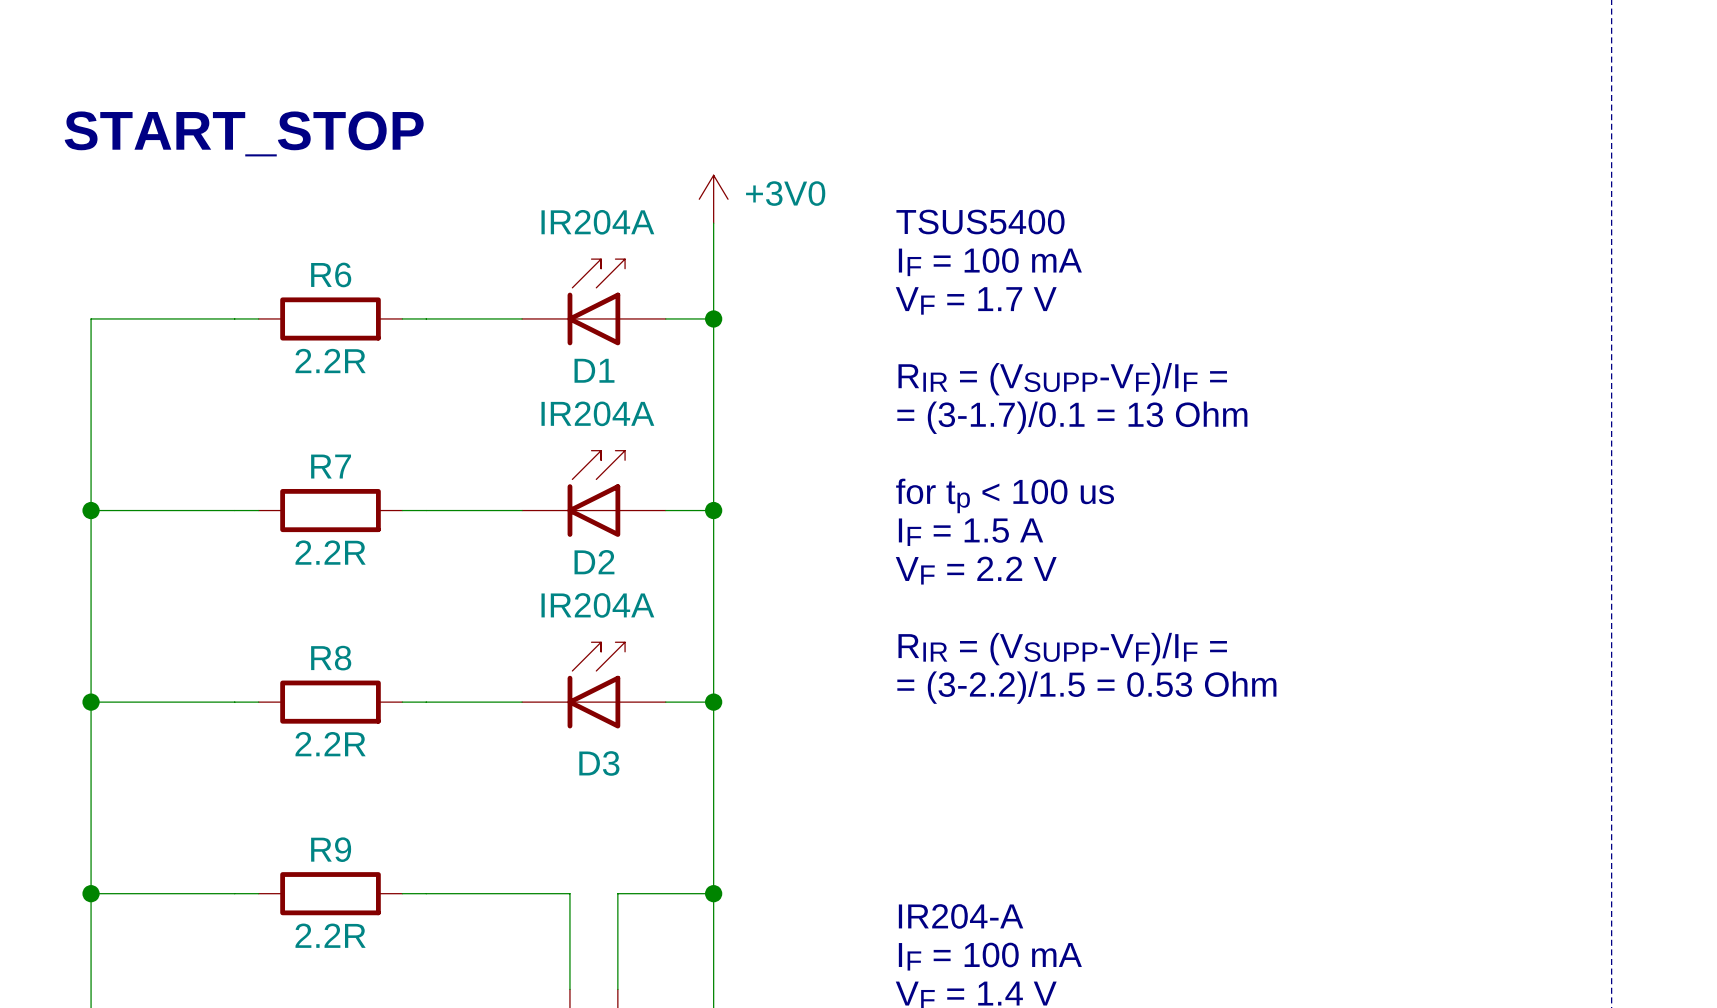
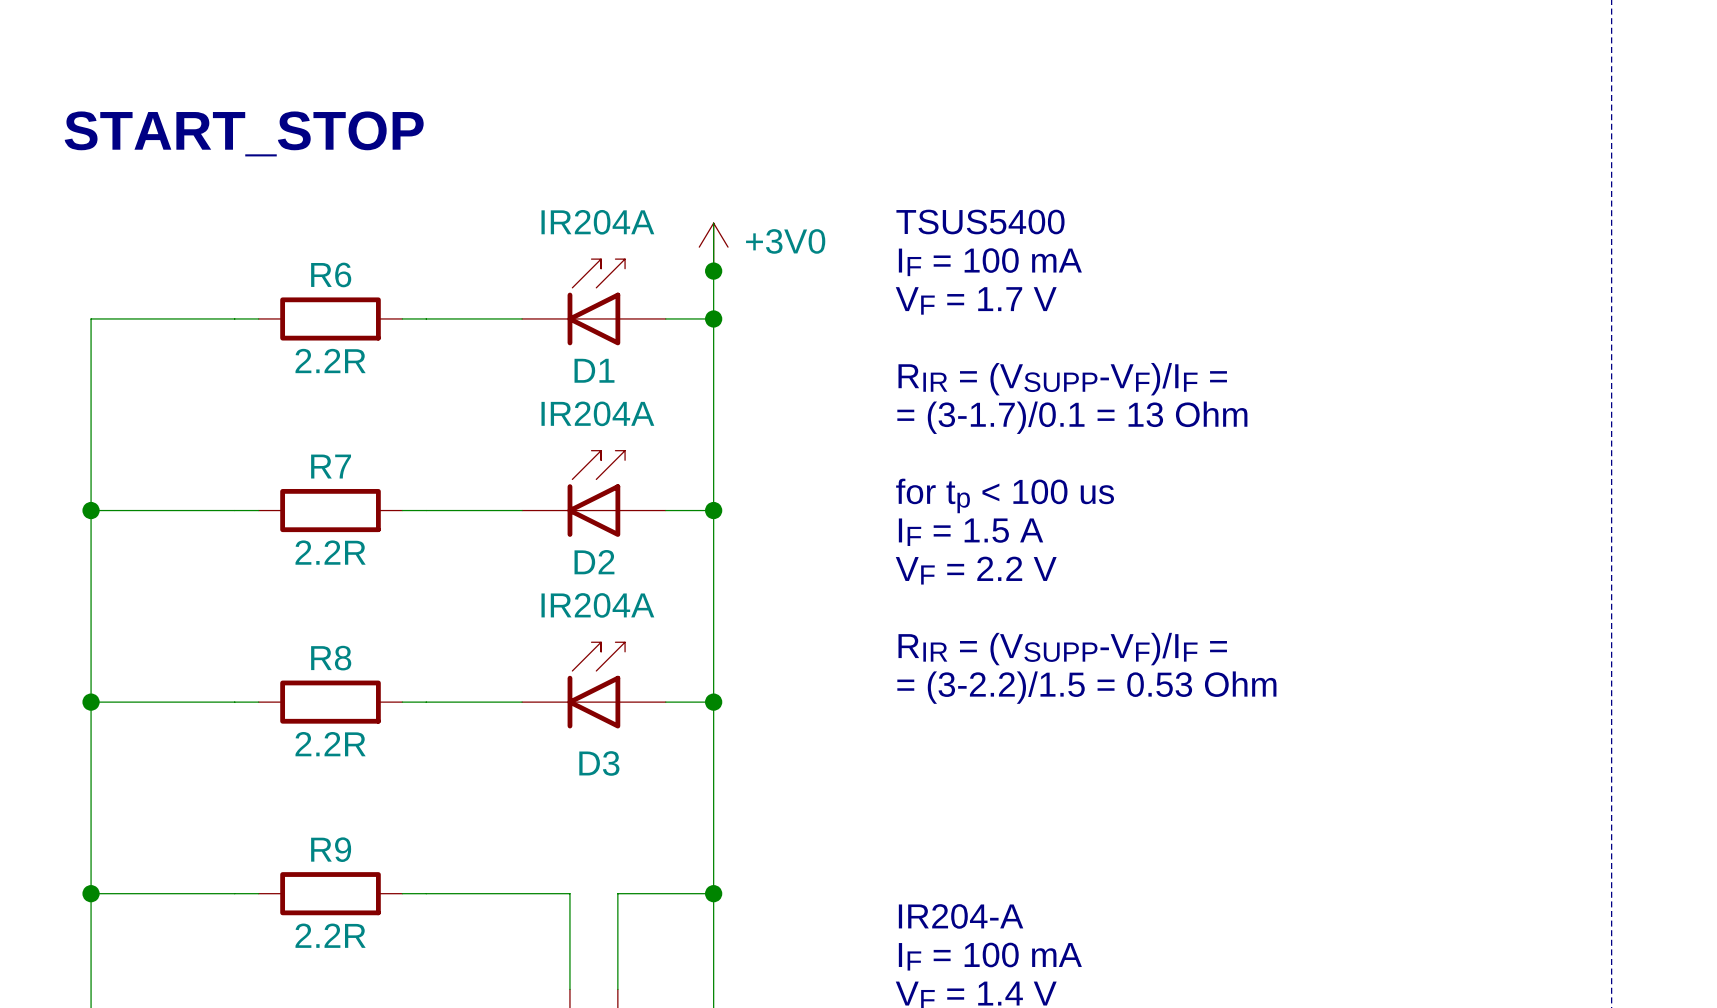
power symbol position: +3V0 (713, 199) -> +3V0 (713, 247)
junction: none -> (713, 271)

